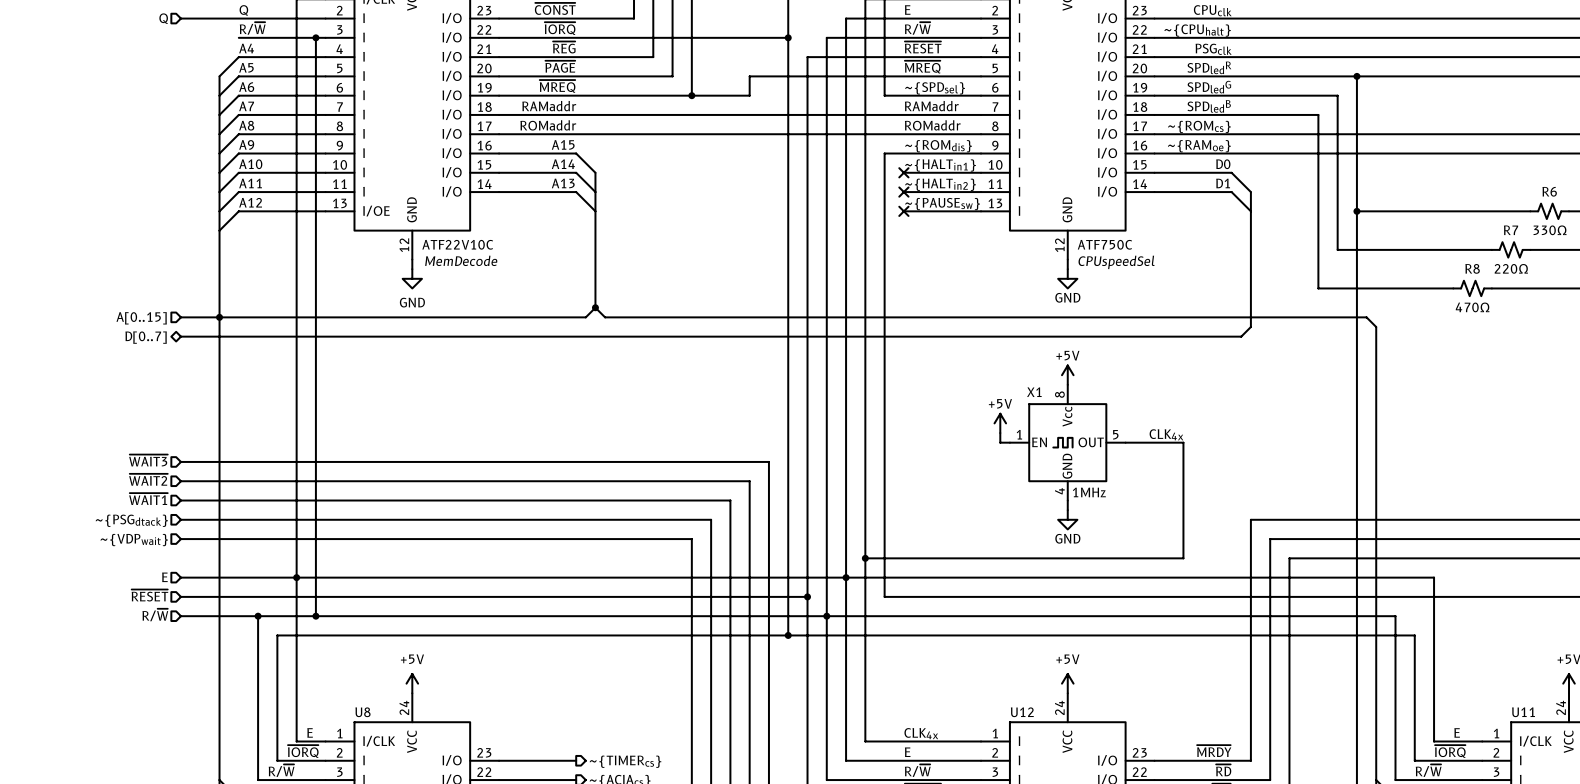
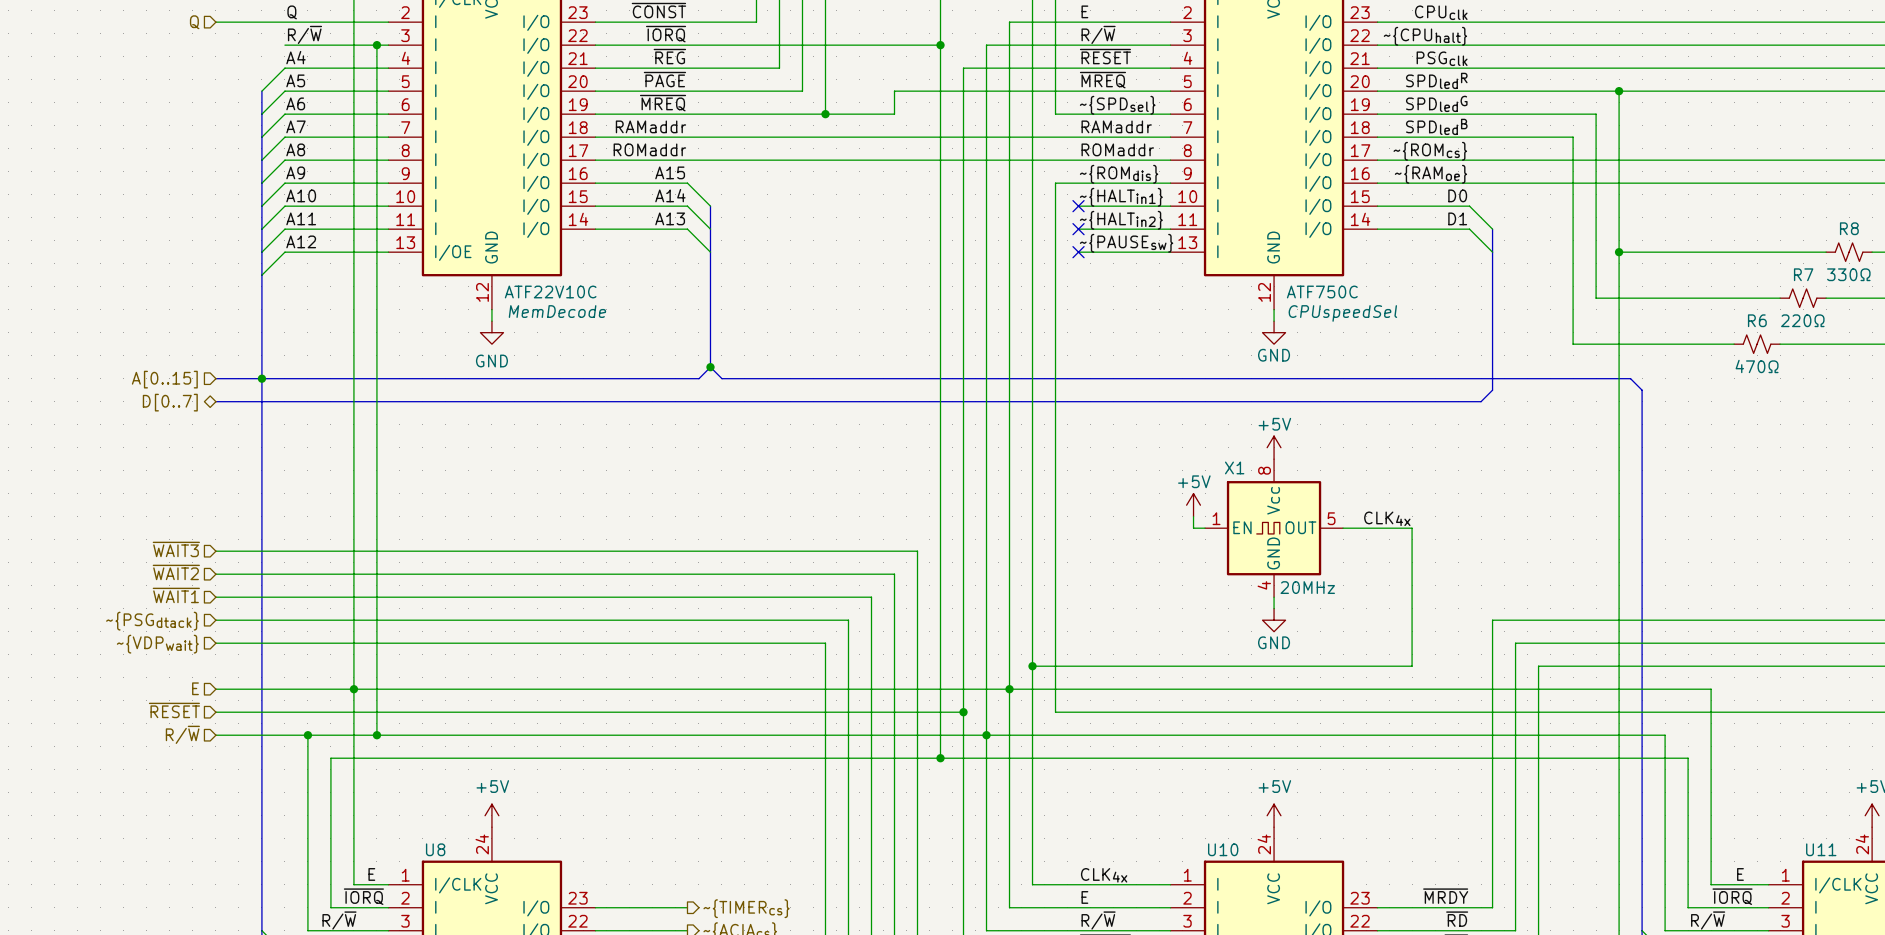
R6 name: R6 (1549, 191) -> R8 (1849, 228)
R8 name: R8 (1472, 268) -> R6 (1757, 320)
X1 value: 1MHz (1089, 492) -> 20MHz (1307, 587)
U12 name: U12 (1022, 712) -> U10 (1223, 849)

